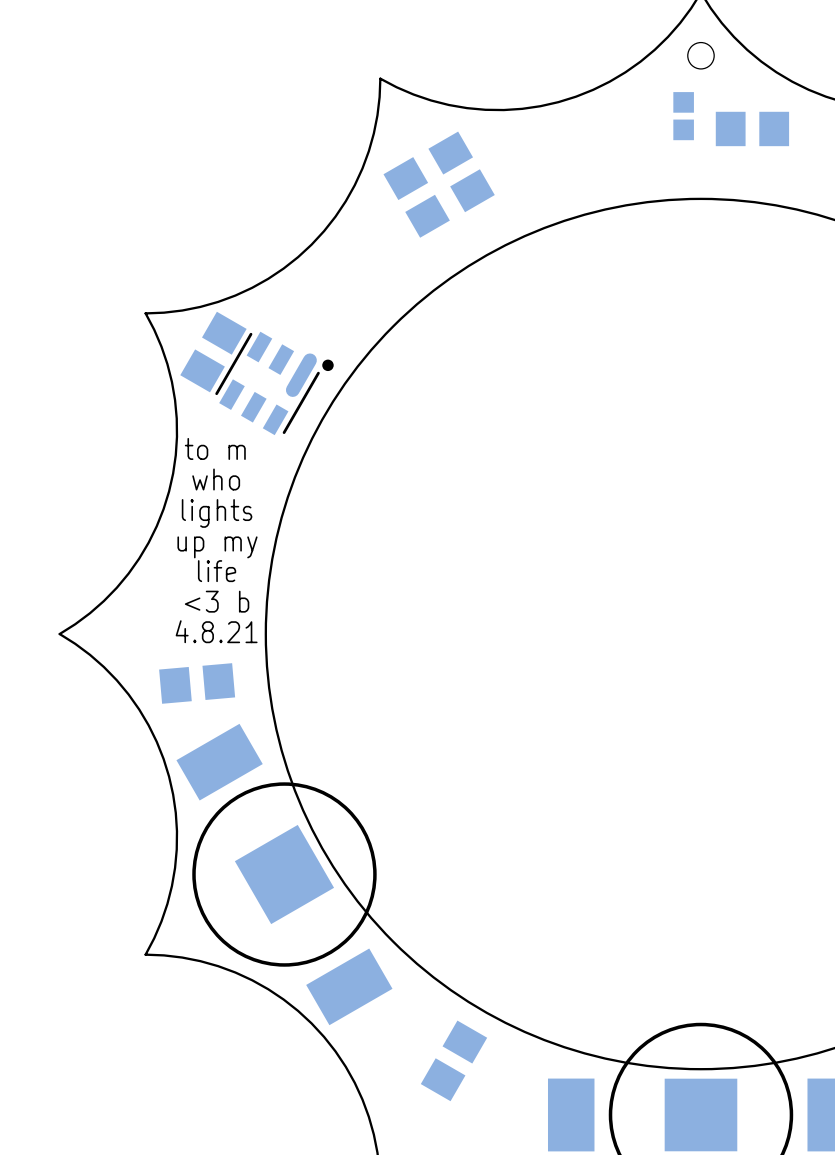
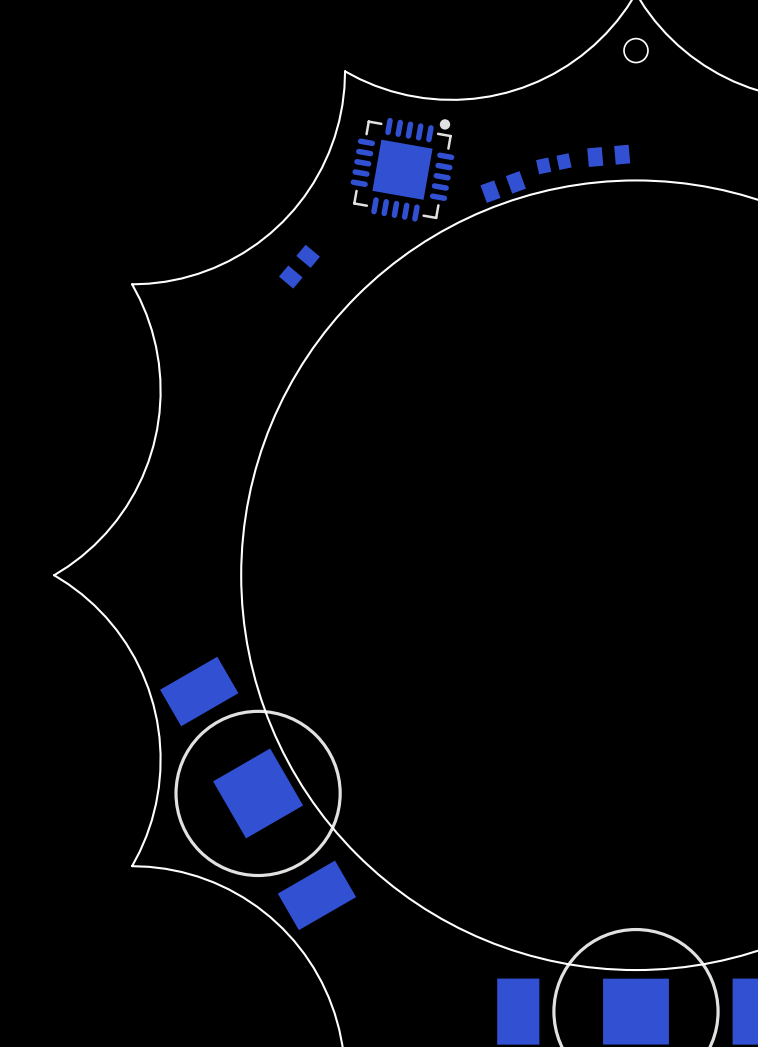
part: (683, 116) -> none
part: (752, 128) -> none
part: (461, 171) -> none
part: none -> (608, 155)
part: none -> (553, 163)
part: none -> (402, 169)
part: (416, 197) -> none
part: none -> (503, 186)
part: none -> (299, 266)
part: (213, 352) -> none
part: (274, 383) -> none
text: to m (215, 448) -> none
text: who (216, 479) -> none
text: lights (217, 513) -> none
text: up my (217, 547) -> none
text: life (217, 571) -> none
text: <3 b (217, 601) -> none
text: 4.8.21 (216, 631) -> none
part: (197, 683) -> none
part: (453, 1060) -> none

